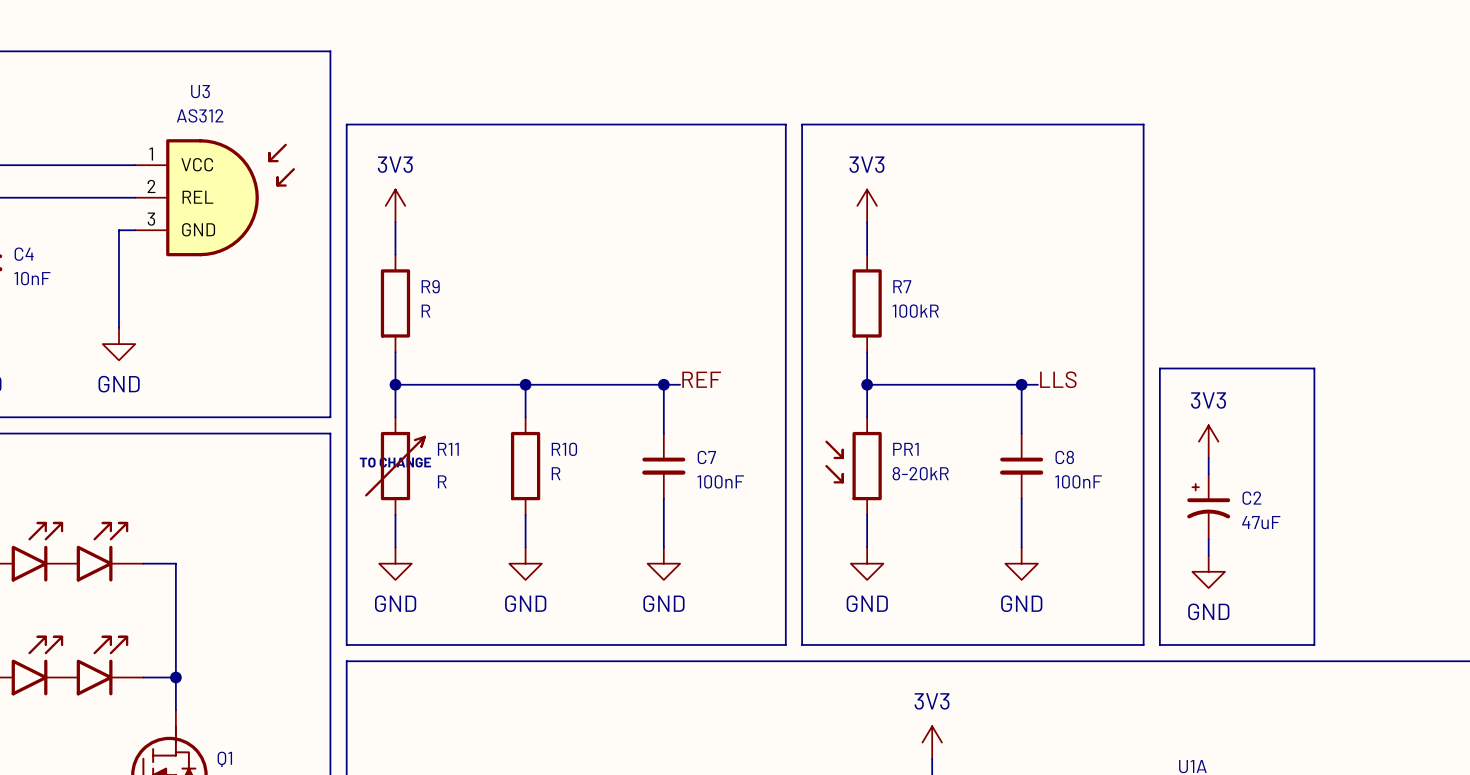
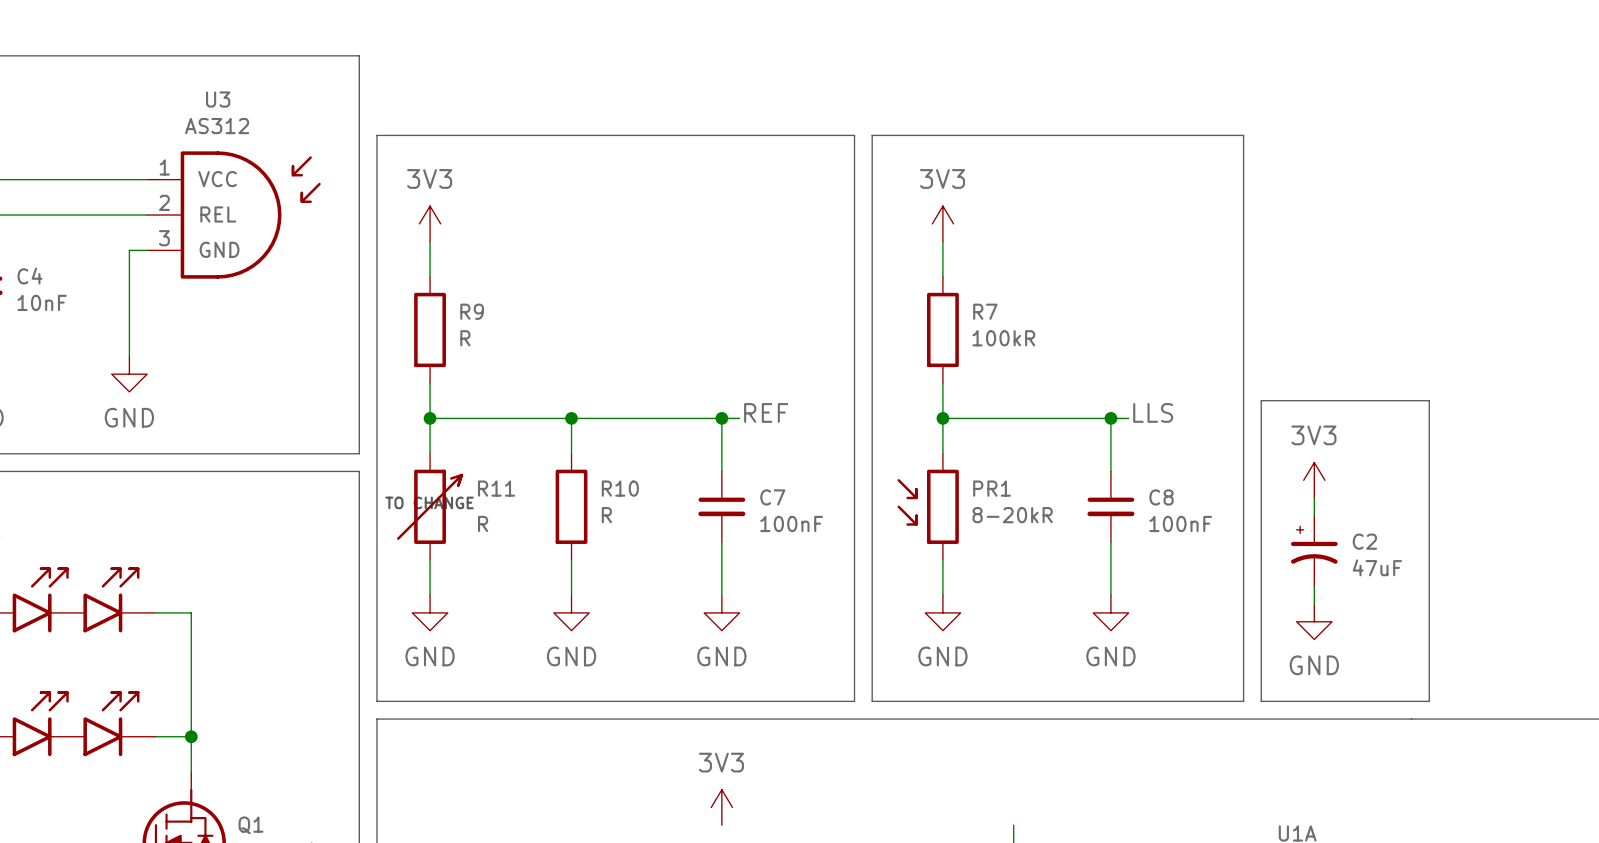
power symbol position: 3V3 (932, 742) -> 3V3 (721, 807)

